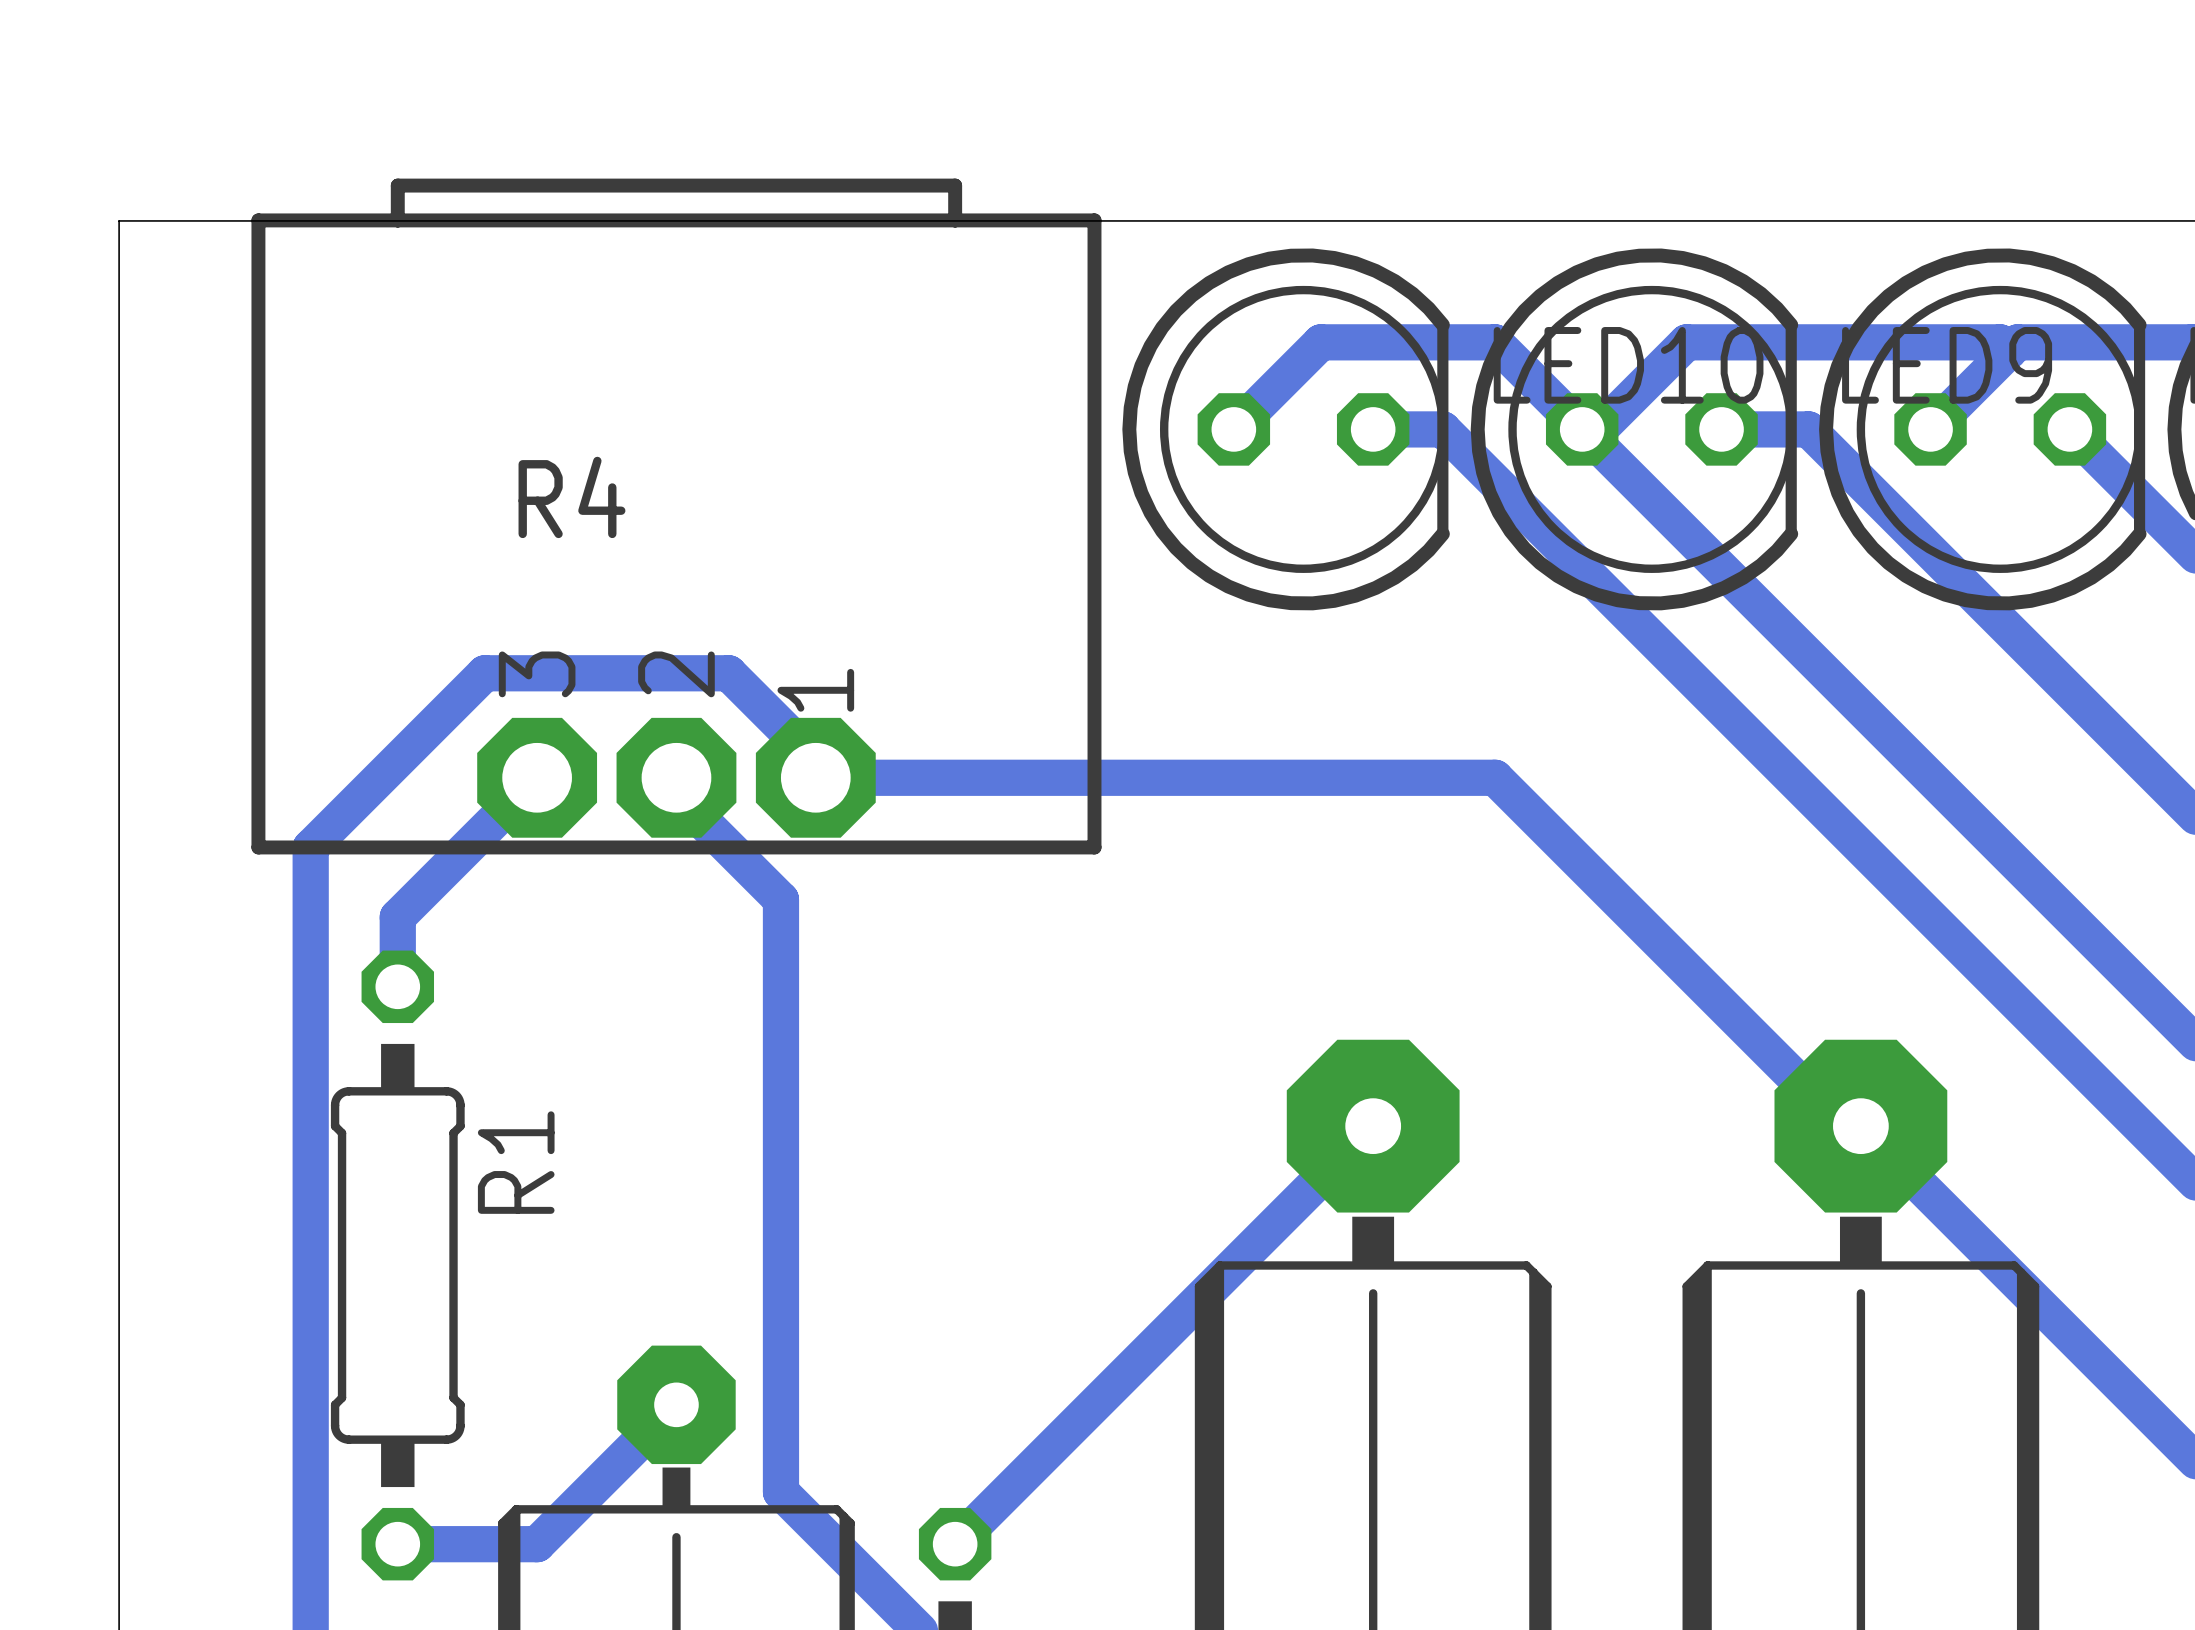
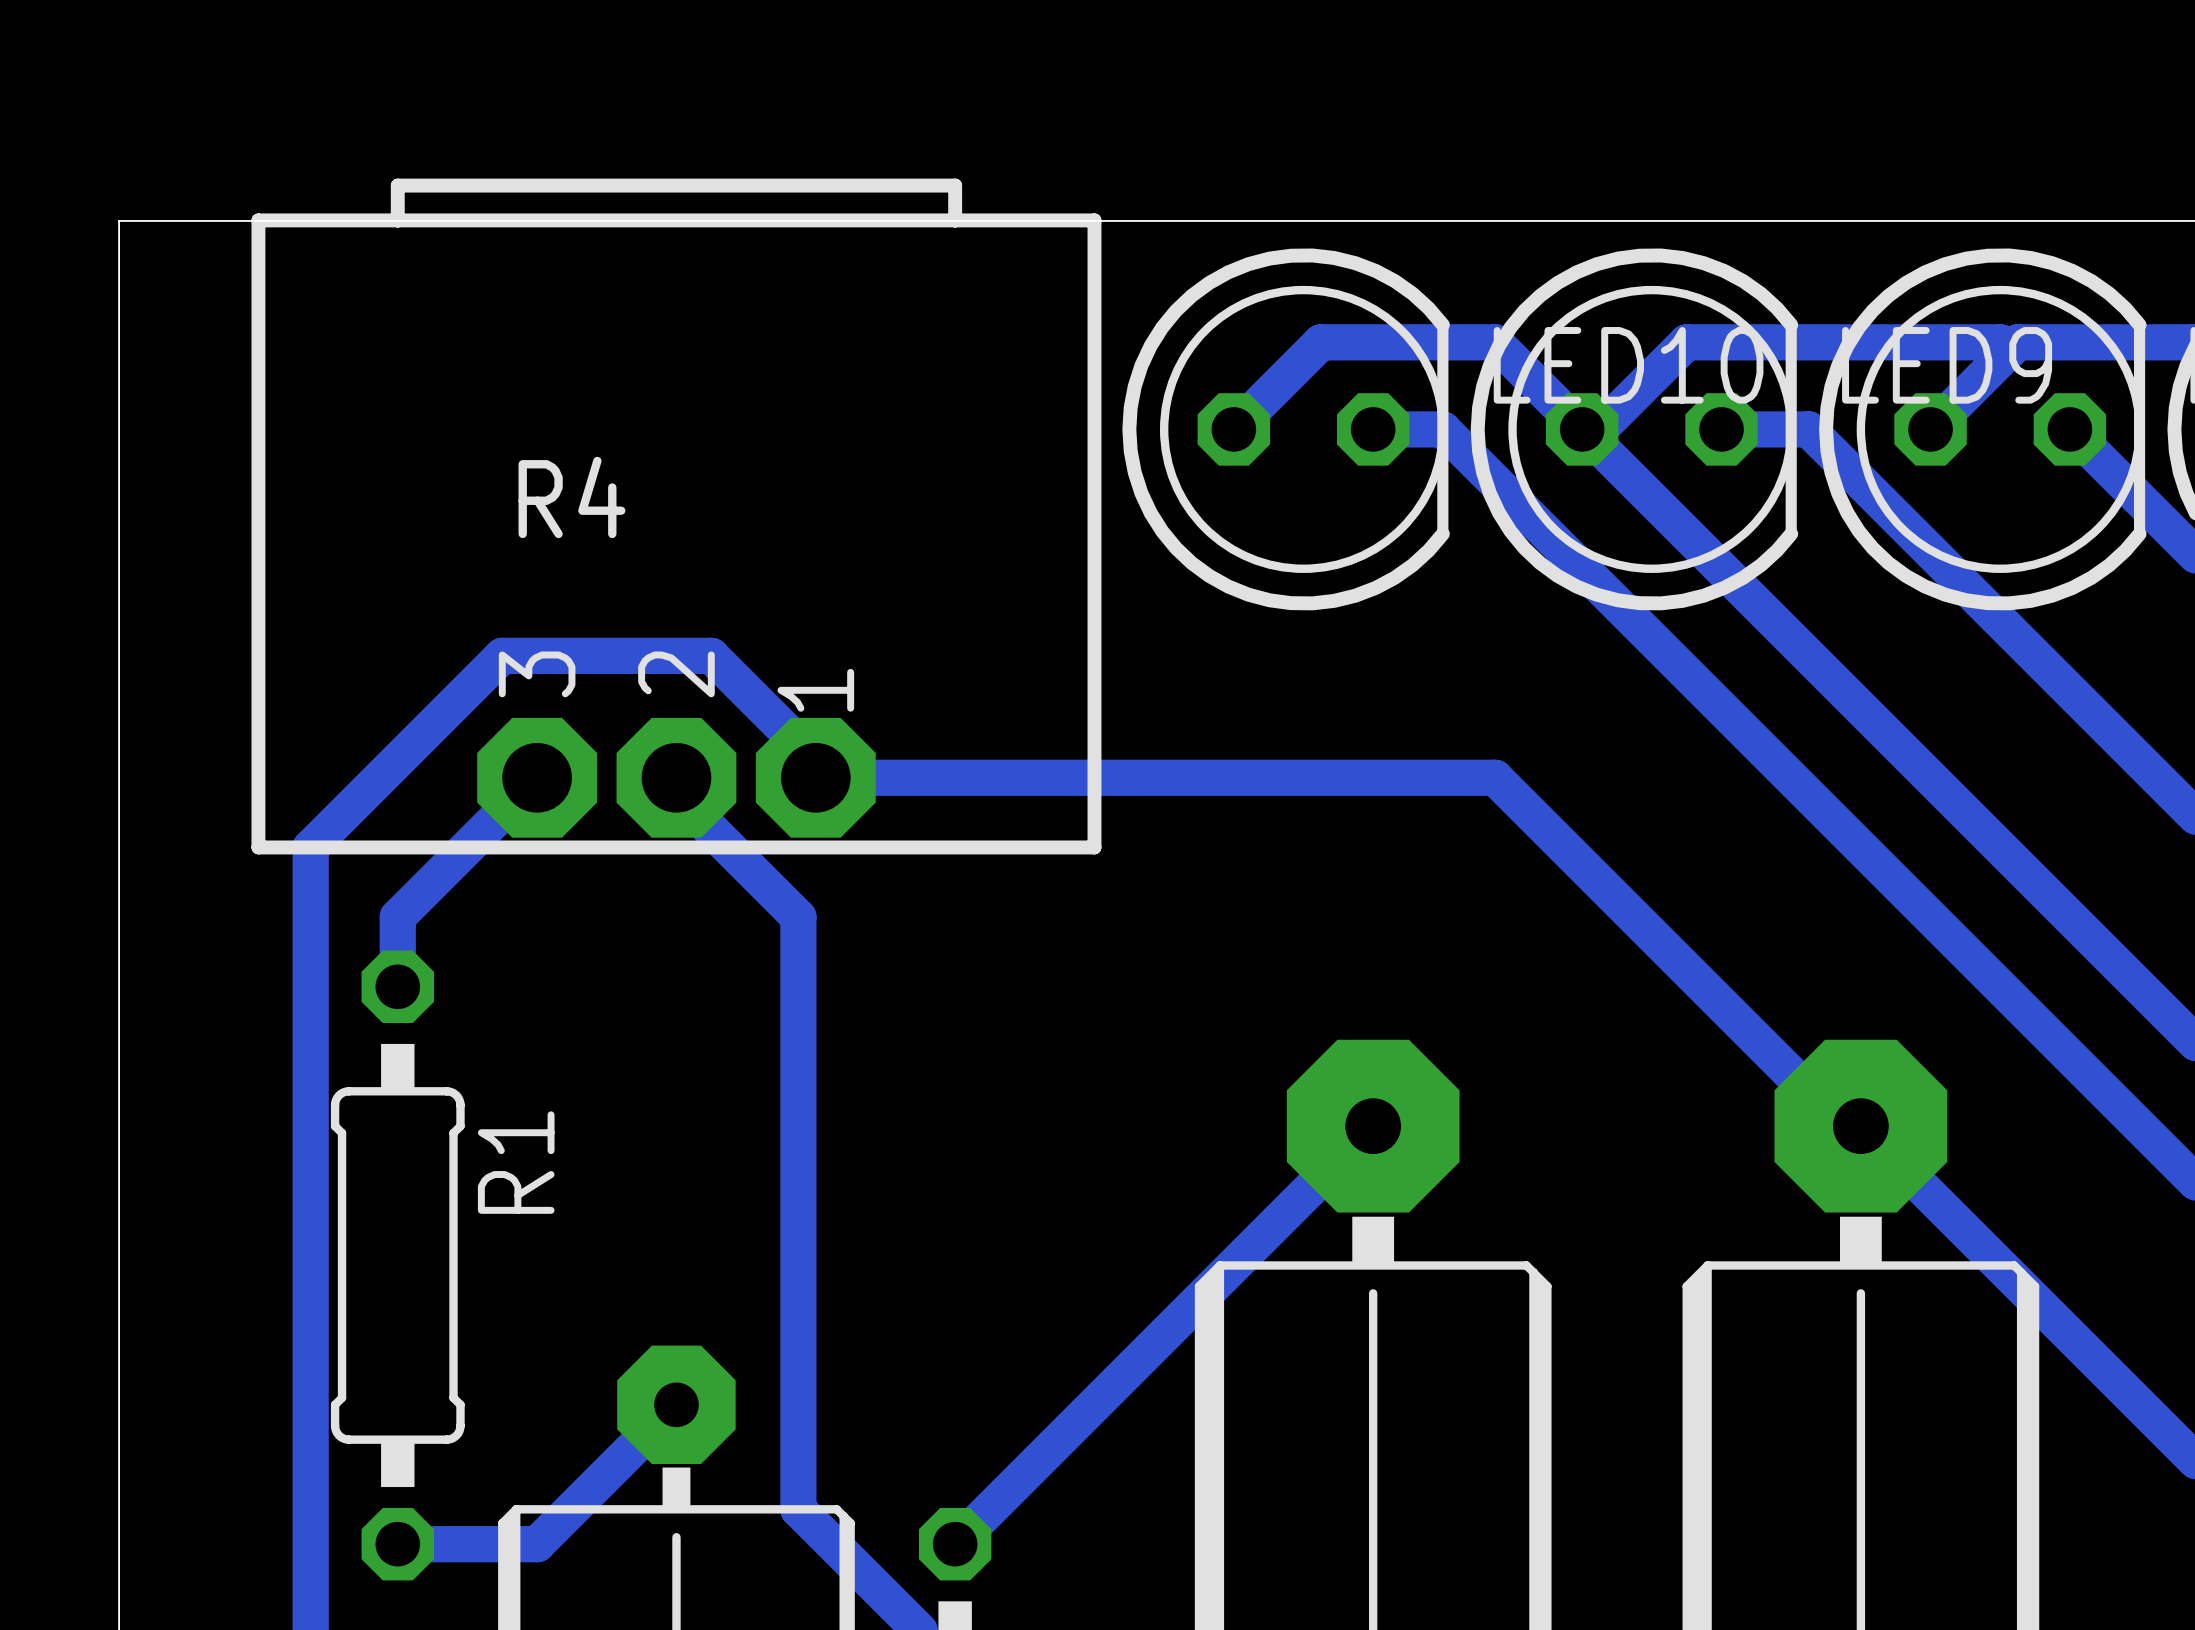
bottom track: (484, 673) (728, 673) -> (484, 673) (502, 655) (711, 655) (728, 673)
bottom track: (780, 899) (780, 1491) (798, 1509) -> (780, 899) (798, 917) (798, 1509)

